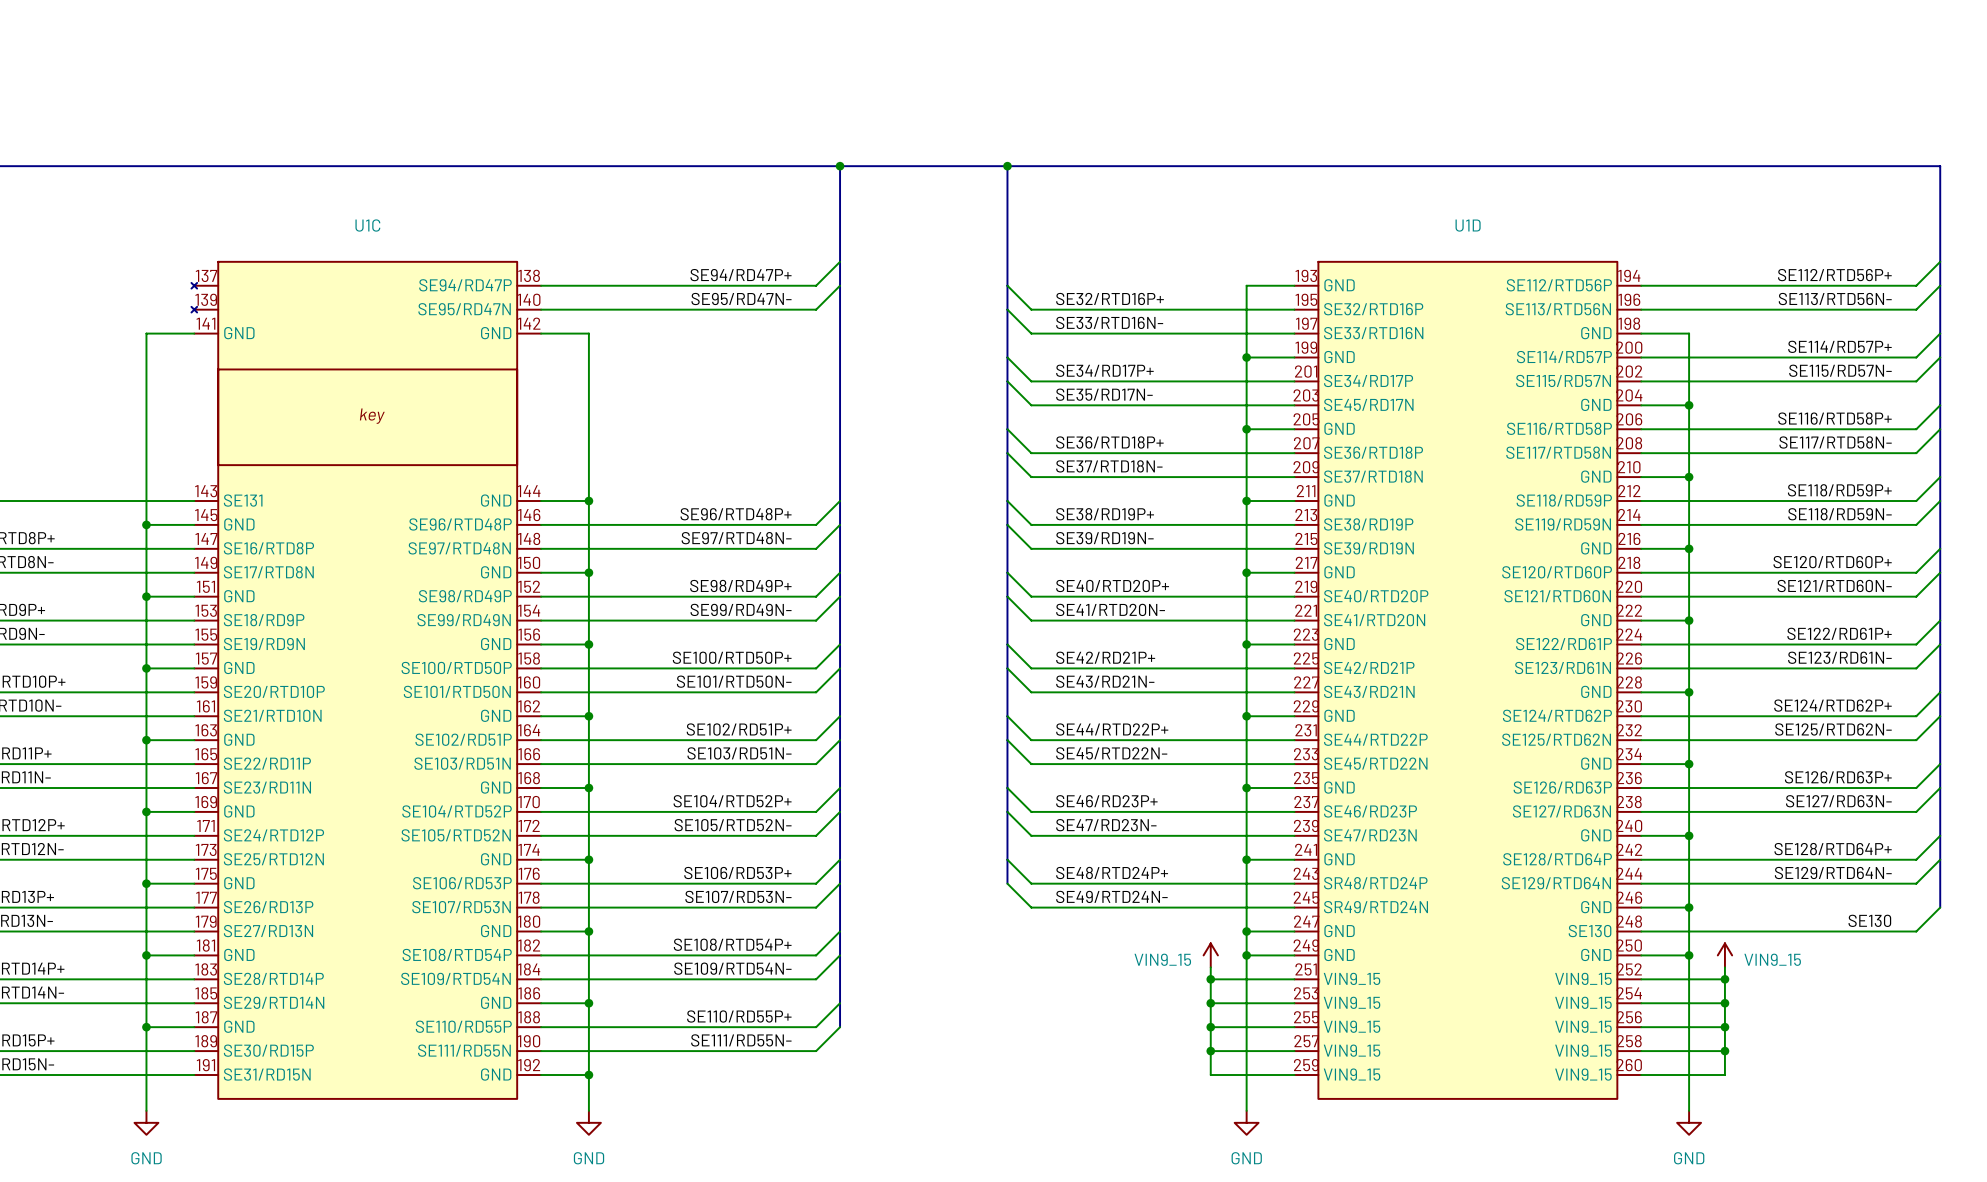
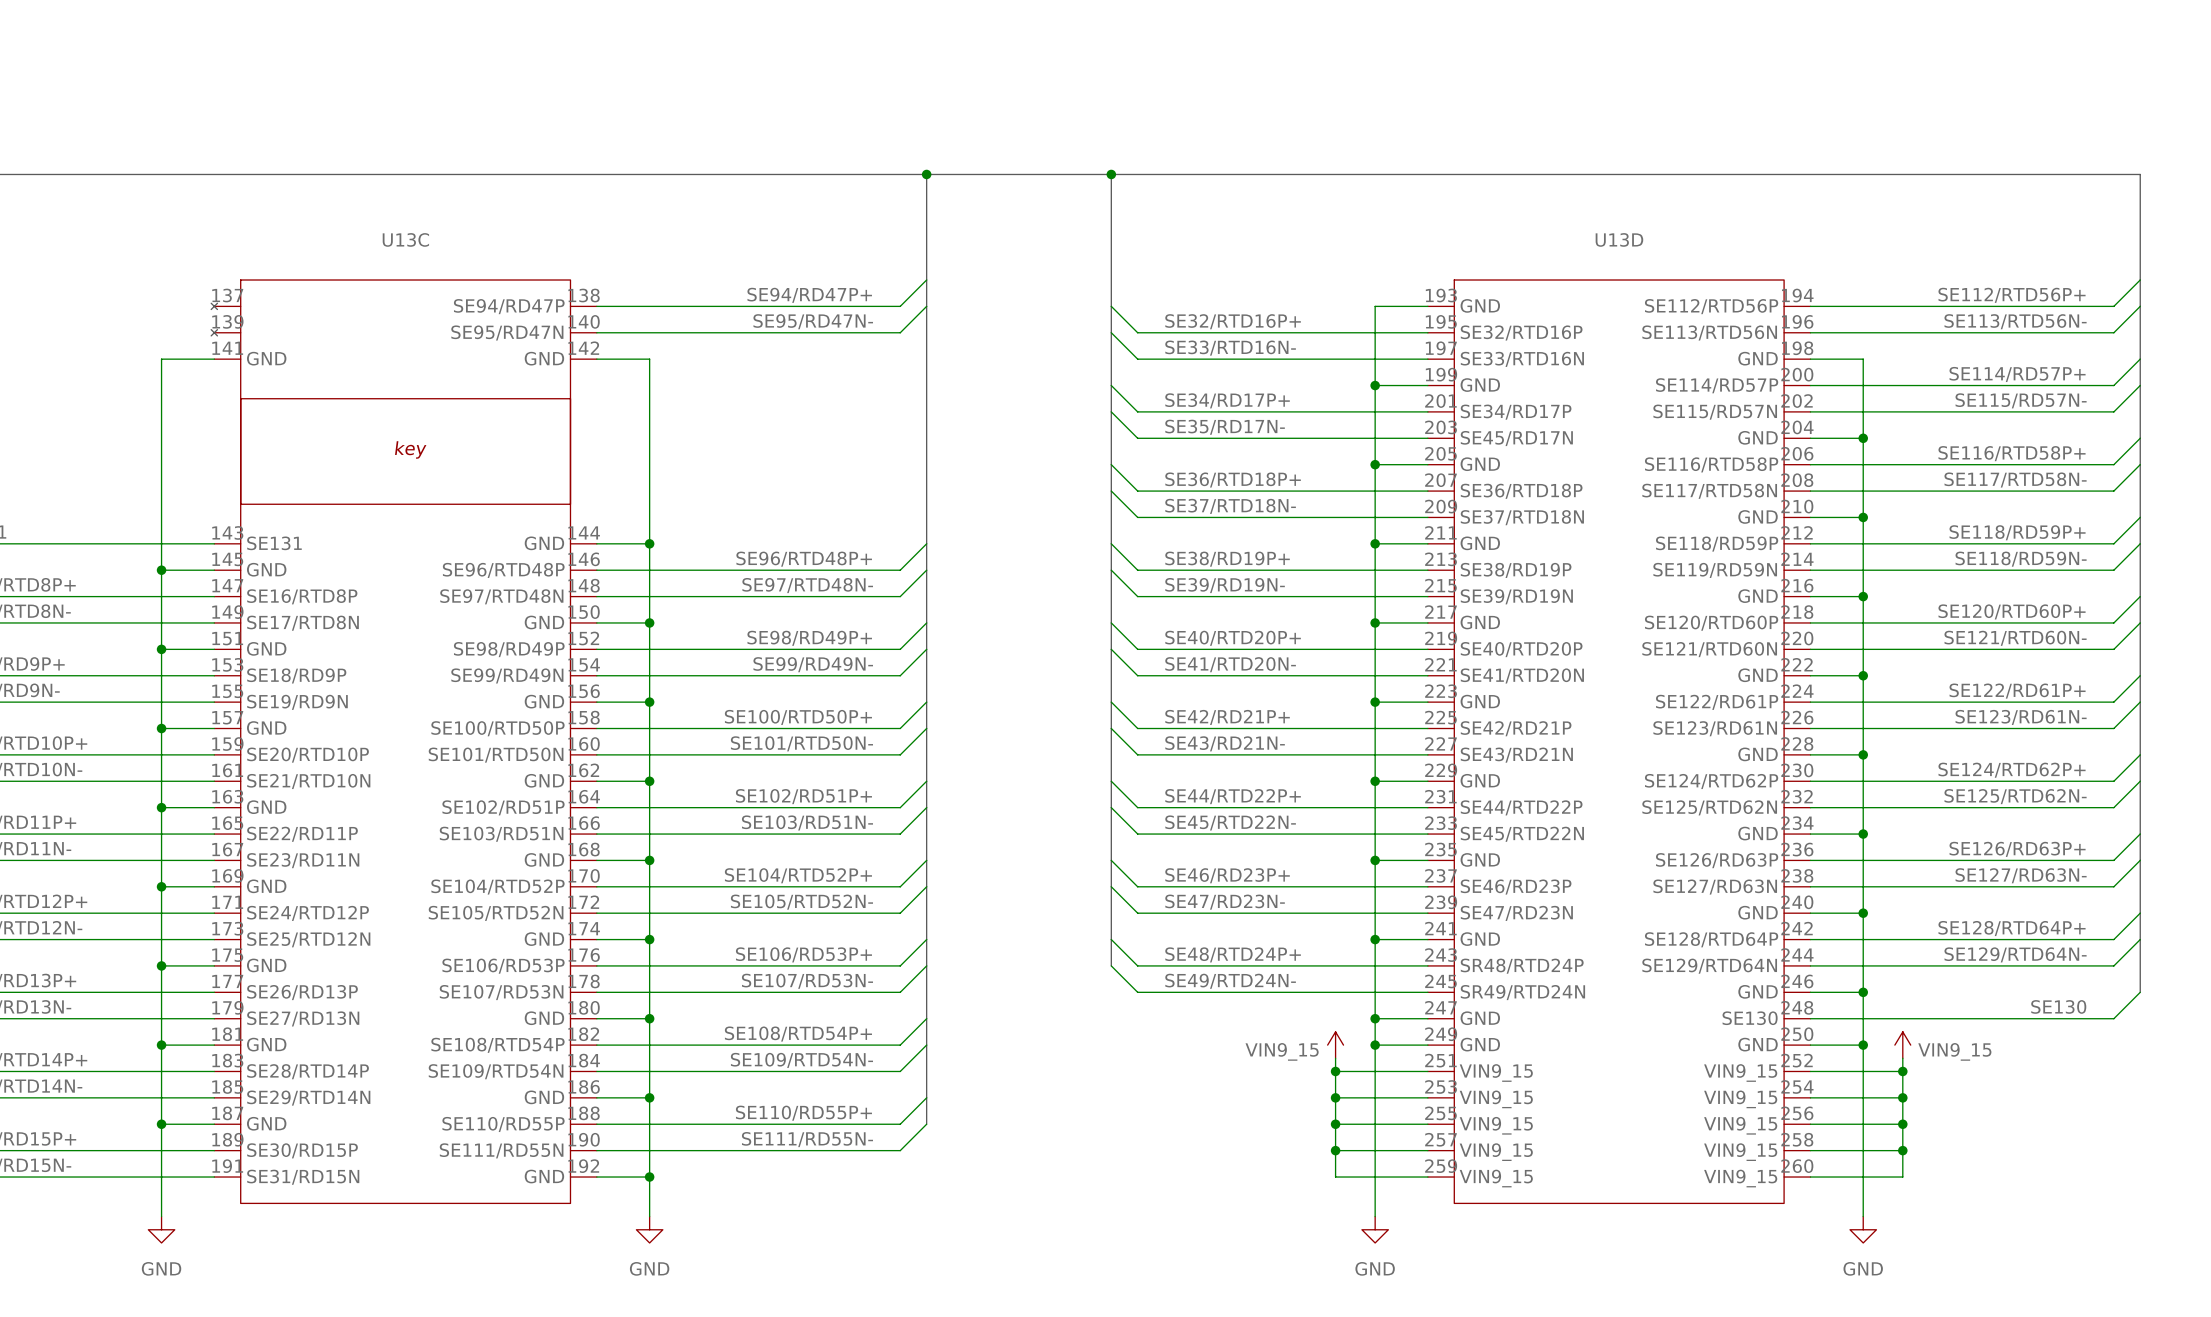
U1C name: U1C (367, 225) -> U13C (405, 239)
U1D name: U1D (1468, 225) -> U13D (1619, 239)

